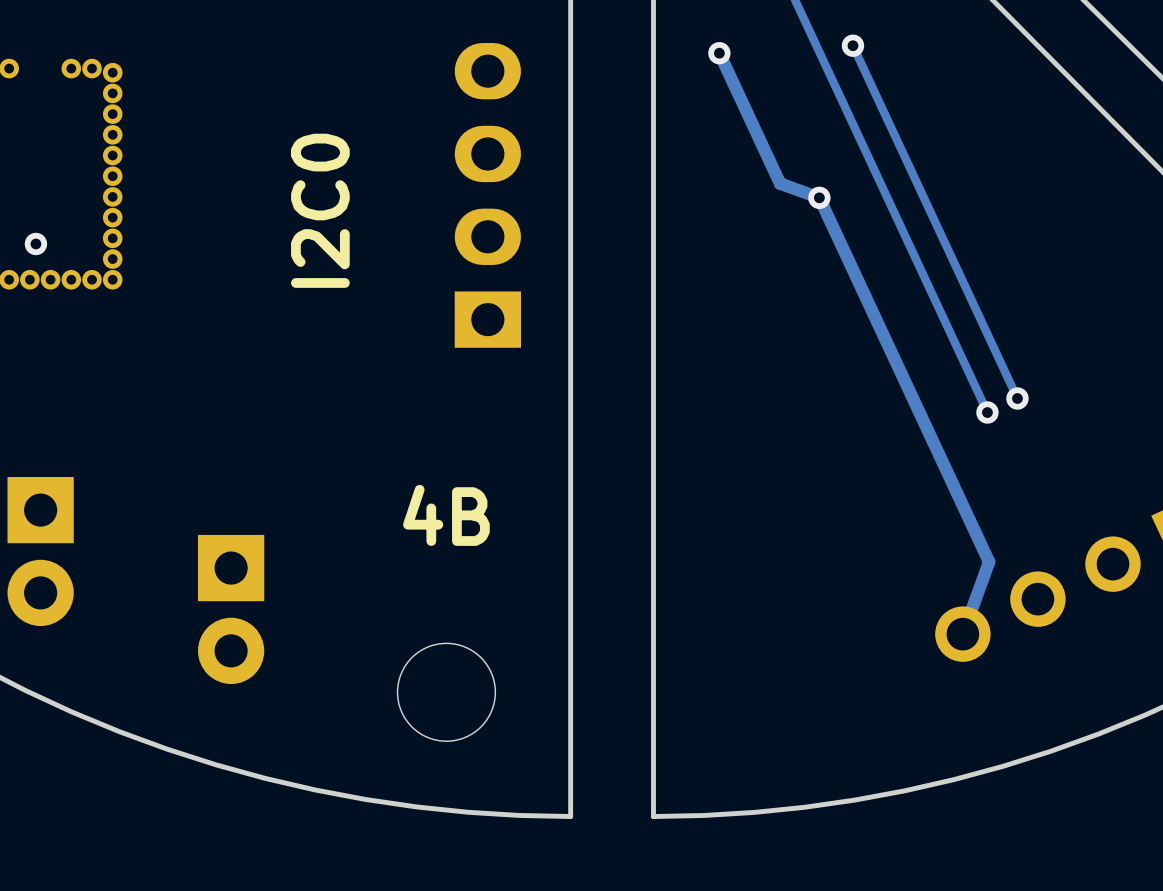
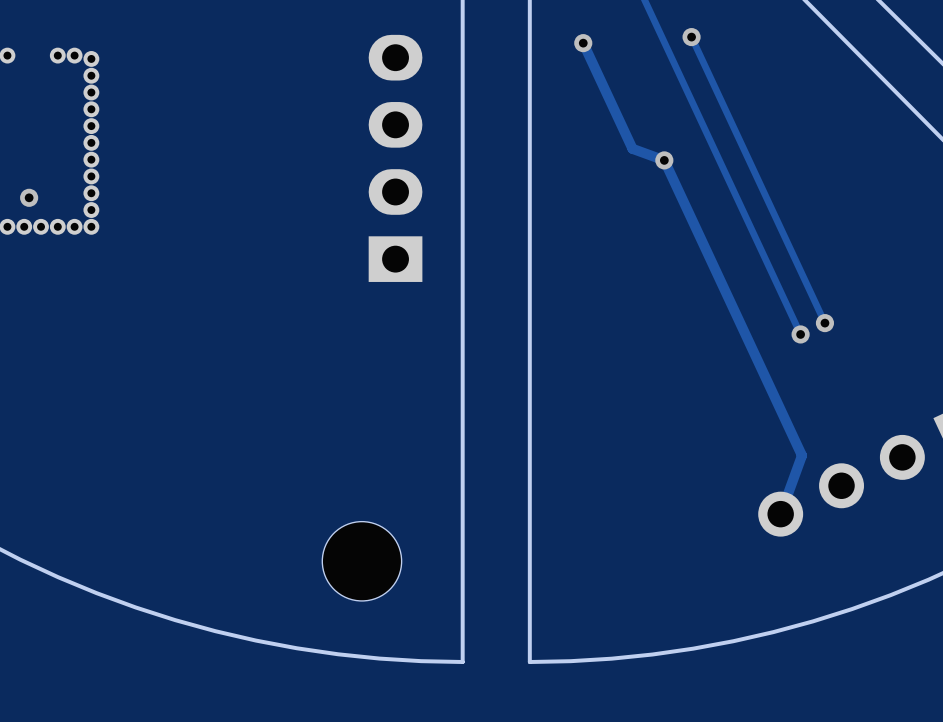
text: I2C0 (320, 210) -> none
text: 4B (446, 515) -> none
part: (40, 551) -> none
part: (231, 609) -> none

